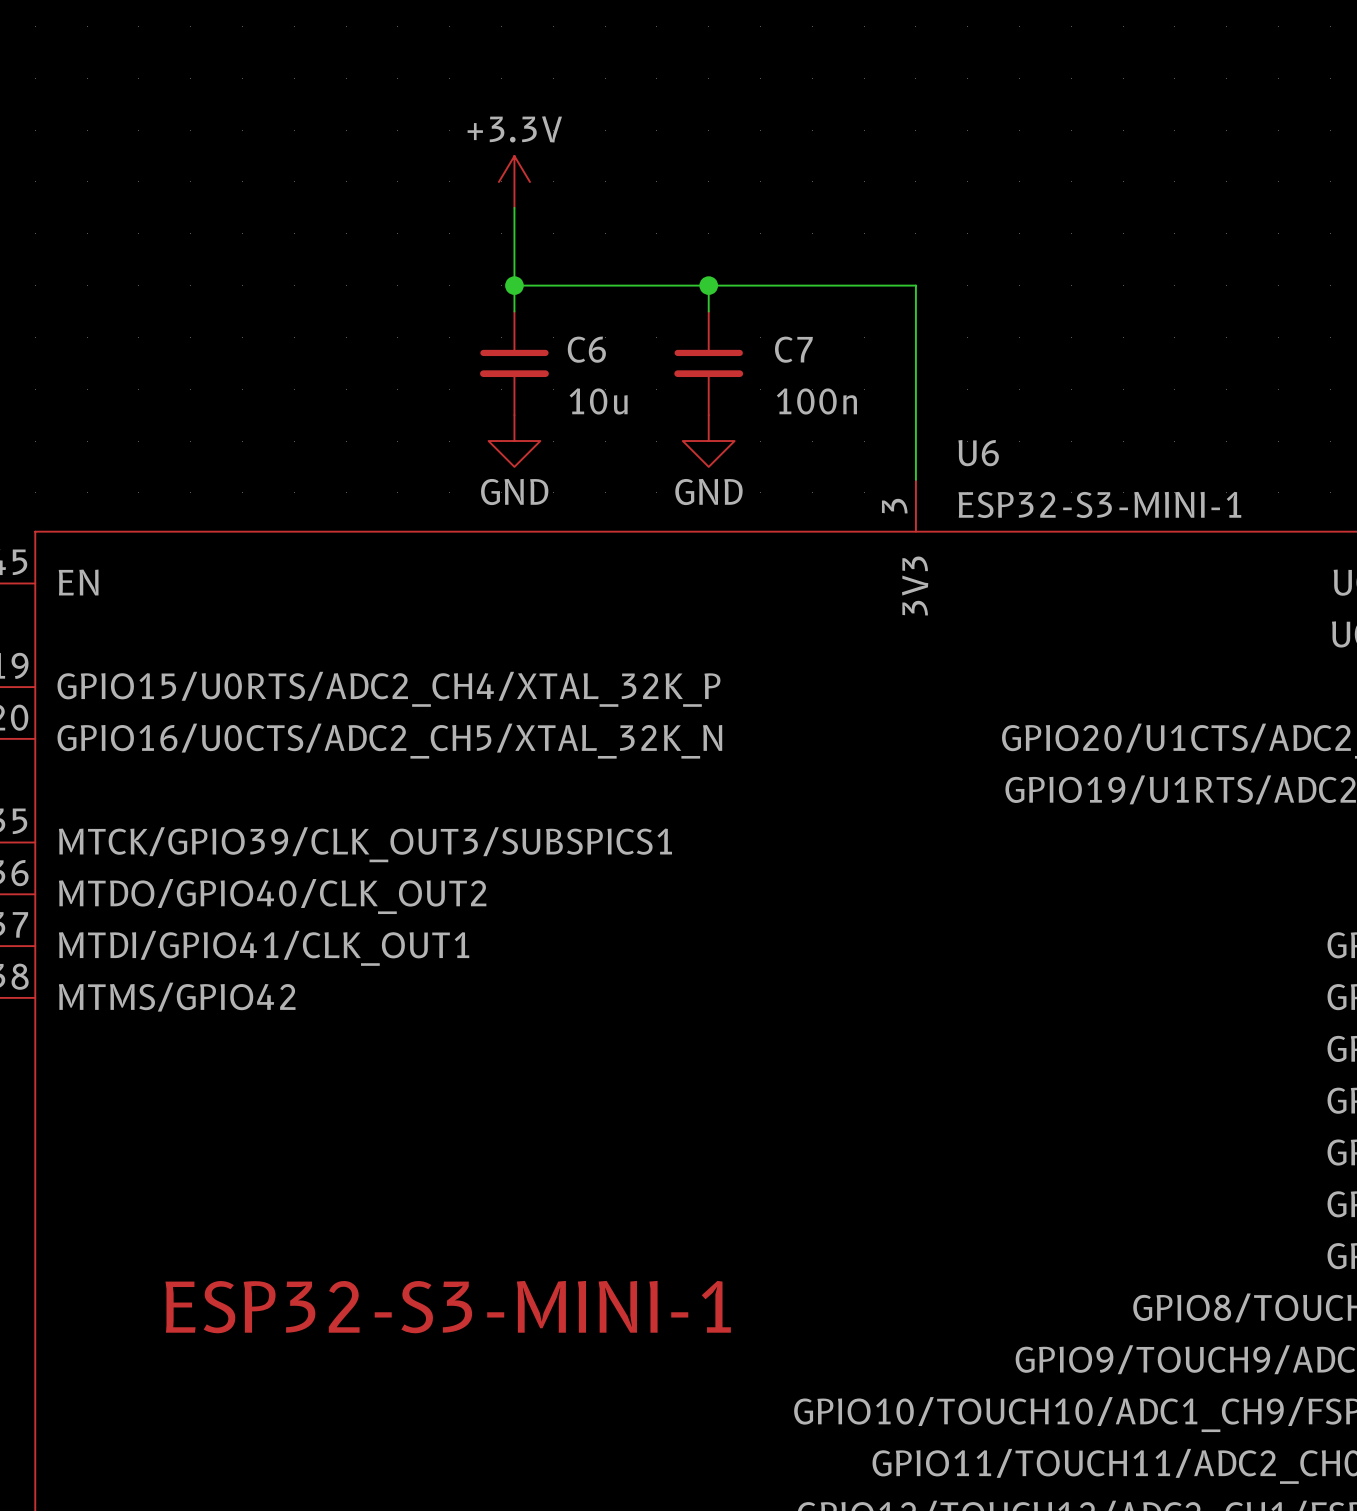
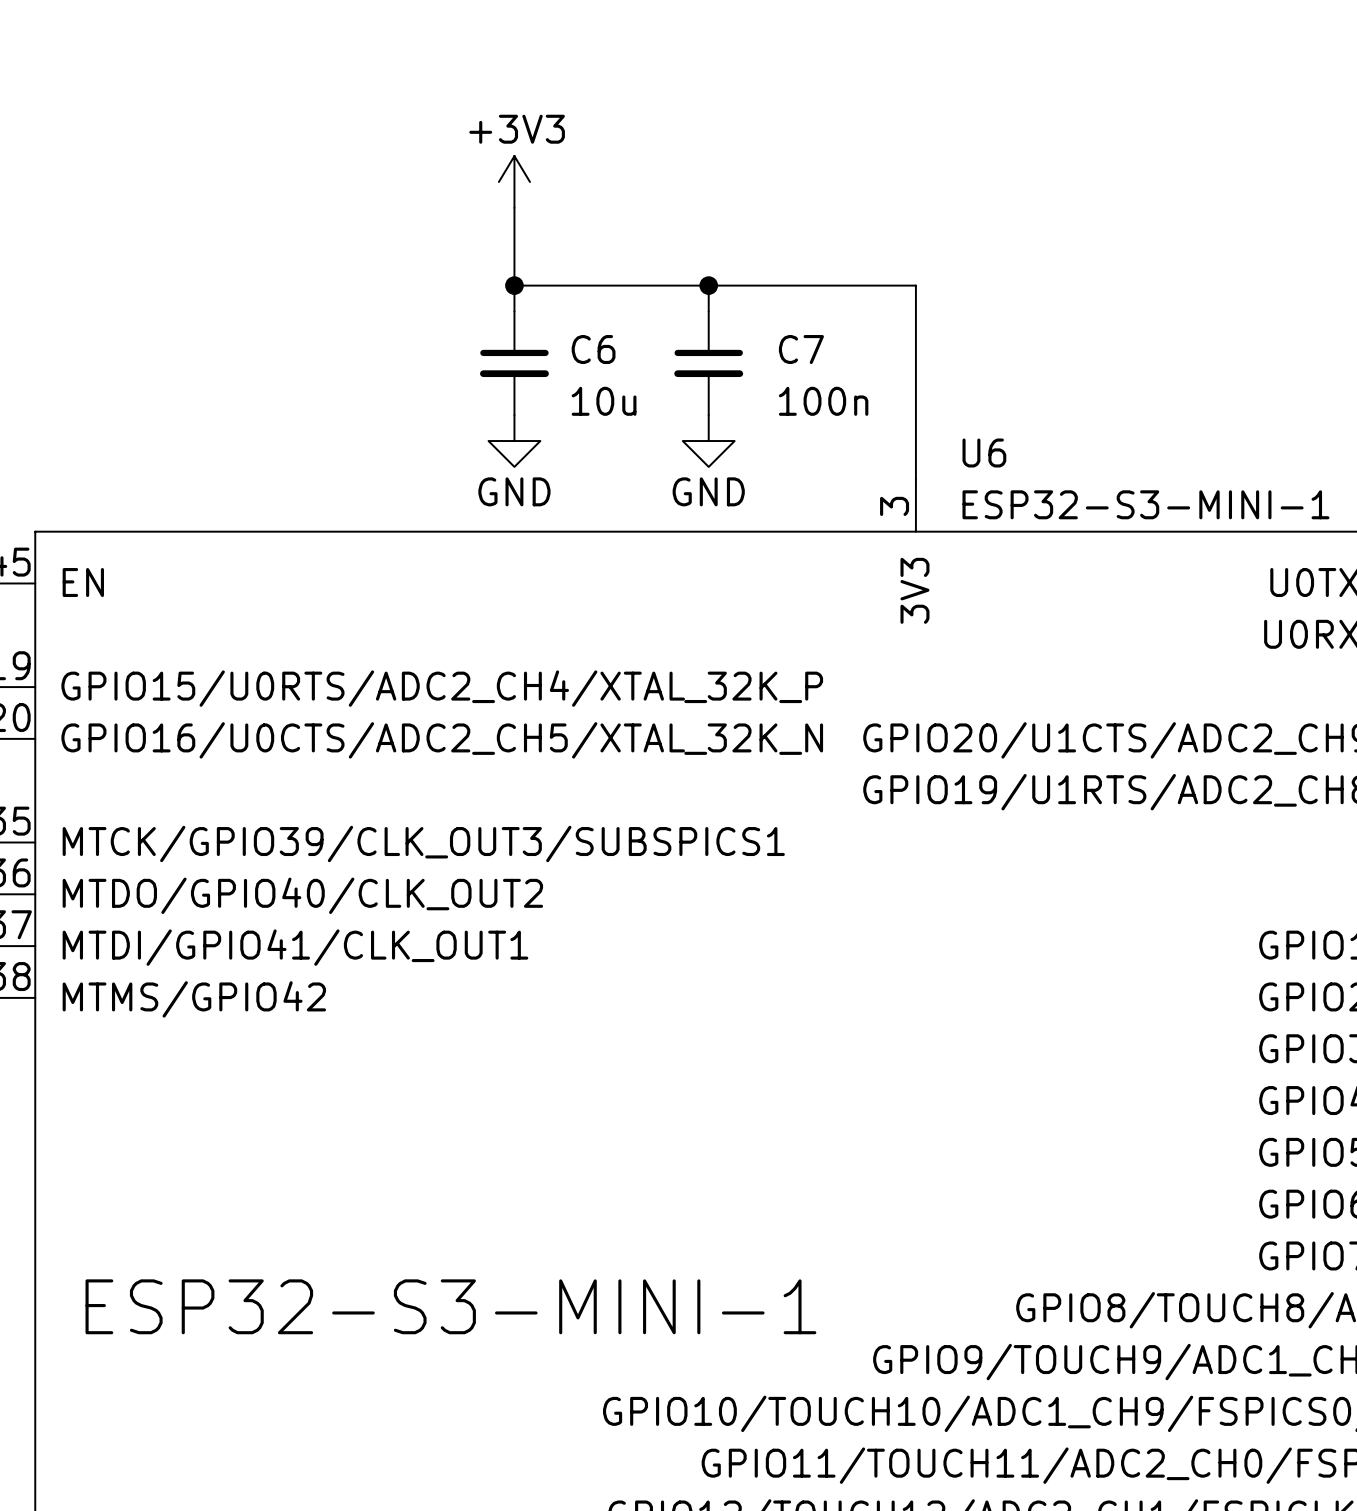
power symbol: +3.3V (514, 181) -> +3V3 (514, 181)

